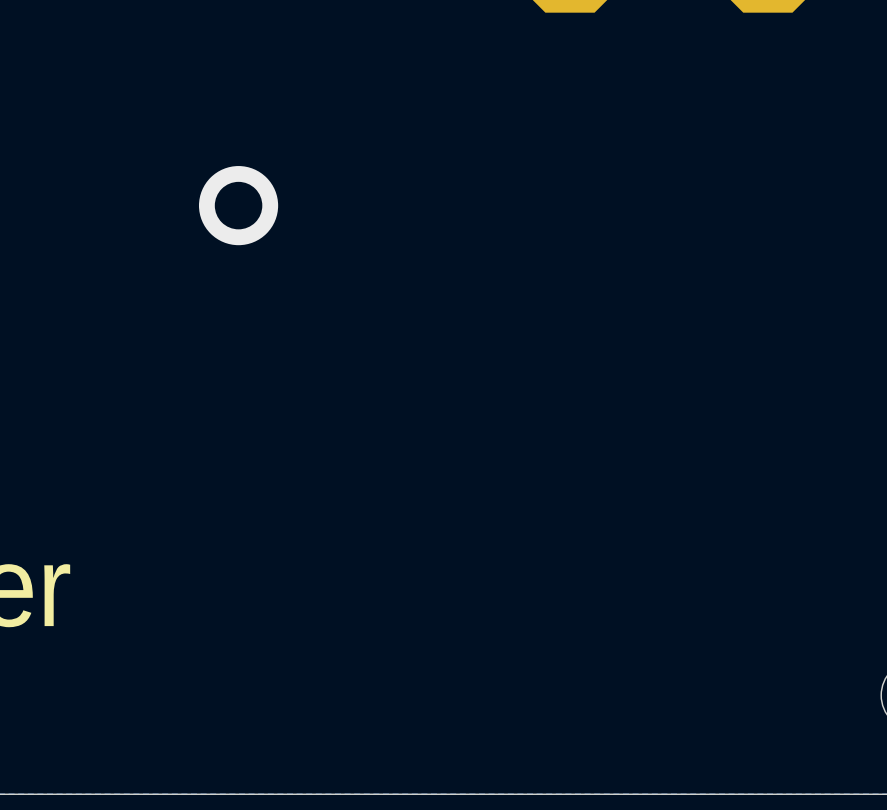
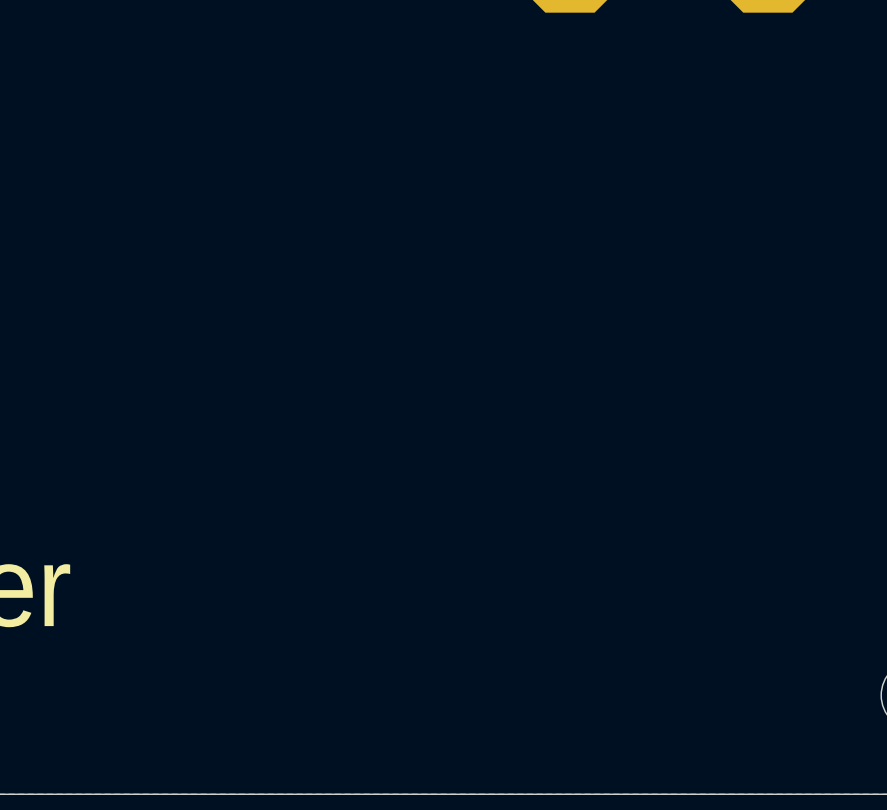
via: (238, 205) -> none

